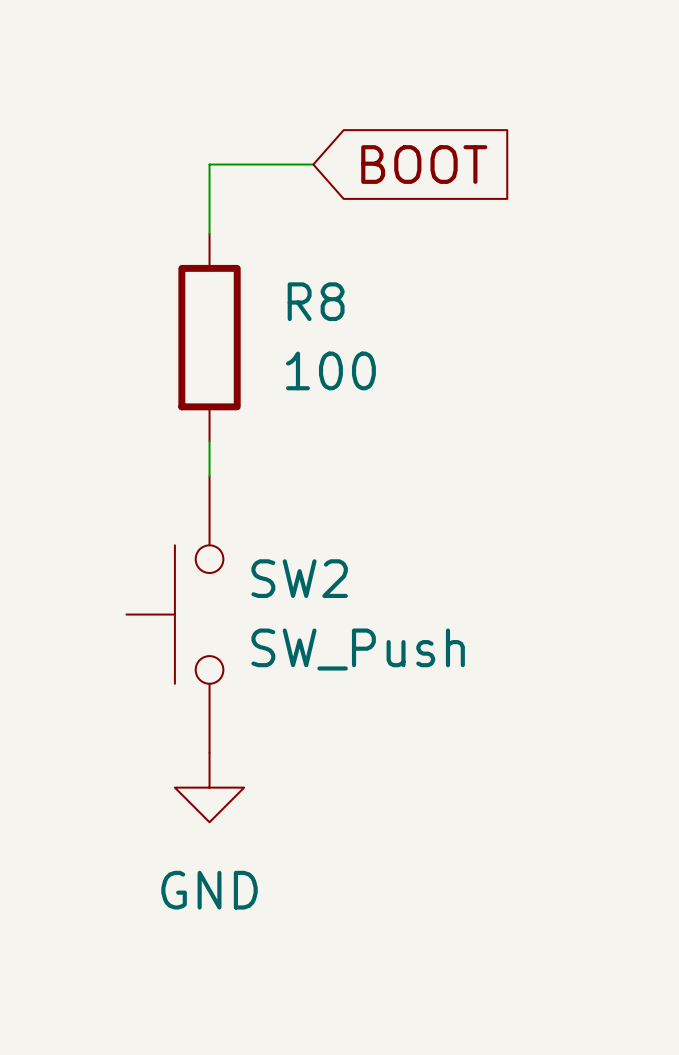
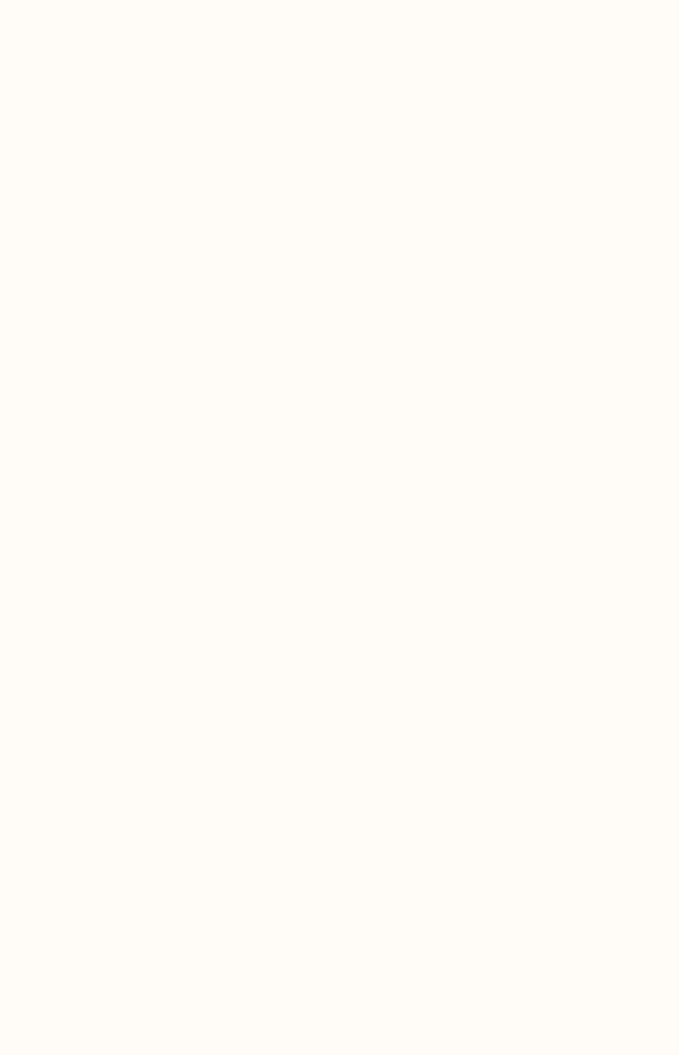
wire: (313, 164) (209, 164) (209, 233) -> none
global label: BOOT (424, 164) -> none
R8: 100 (209, 337) -> none
wire: (209, 441) (209, 476) -> none
SW2: SW_Push (174, 614) -> none
power symbol: GND (209, 787) -> none

